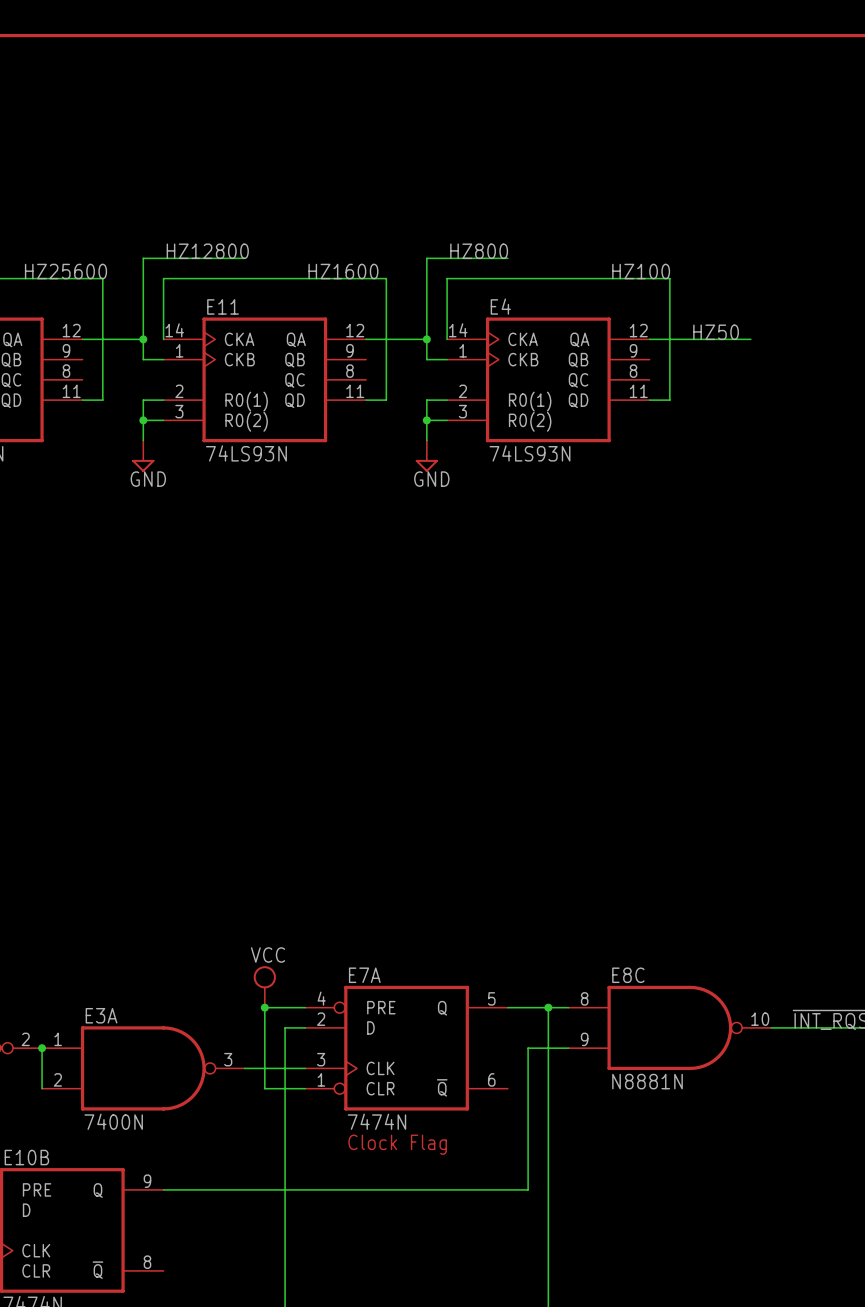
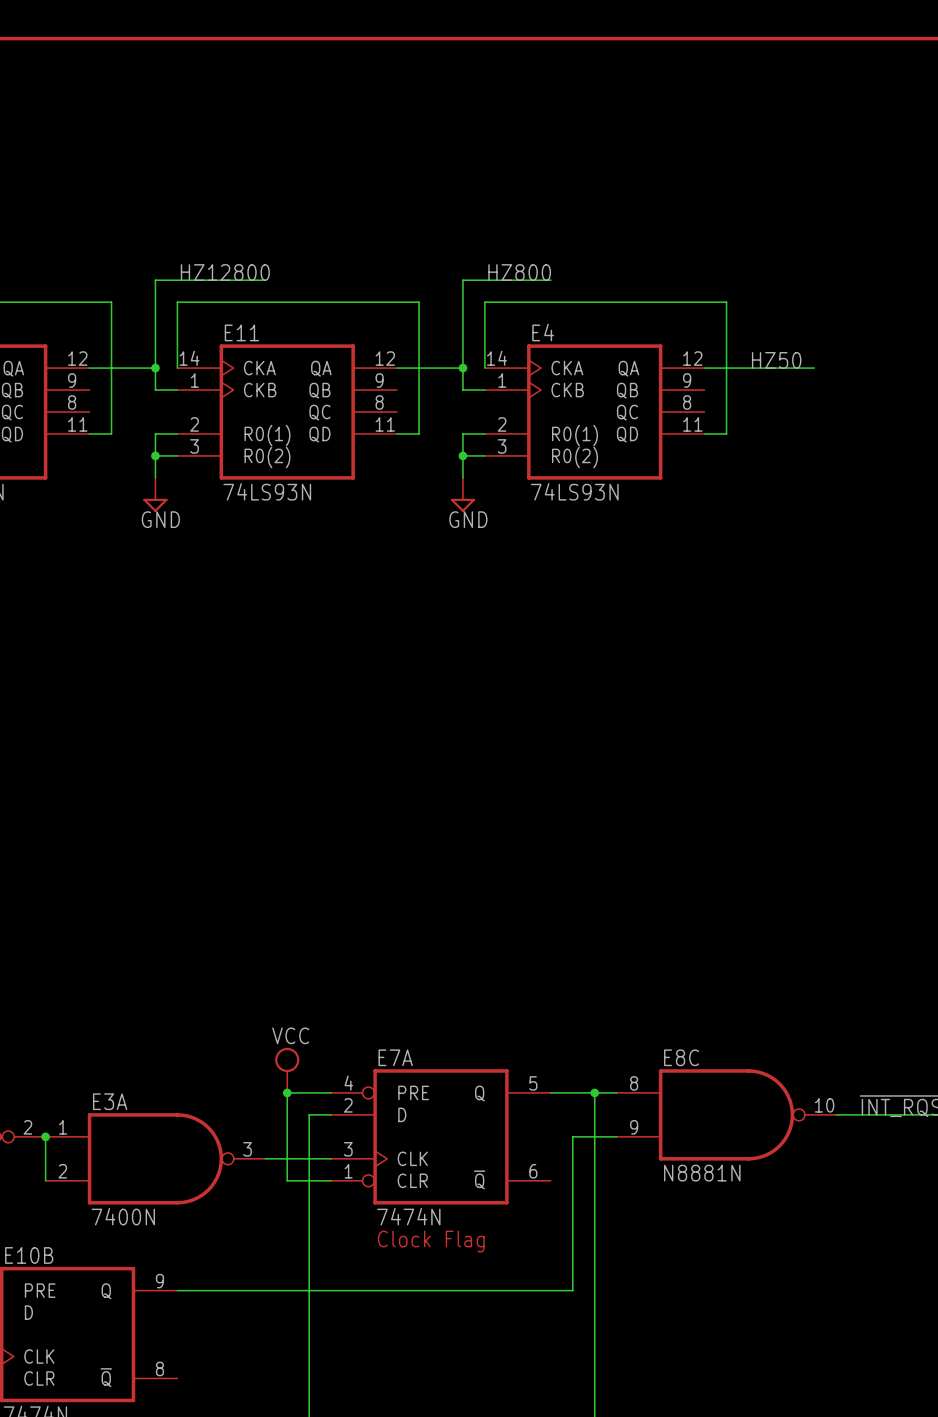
label: HZ25600 (65, 271) -> none
label: HZ1600 (343, 271) -> none
label: HZ100 (641, 271) -> none

